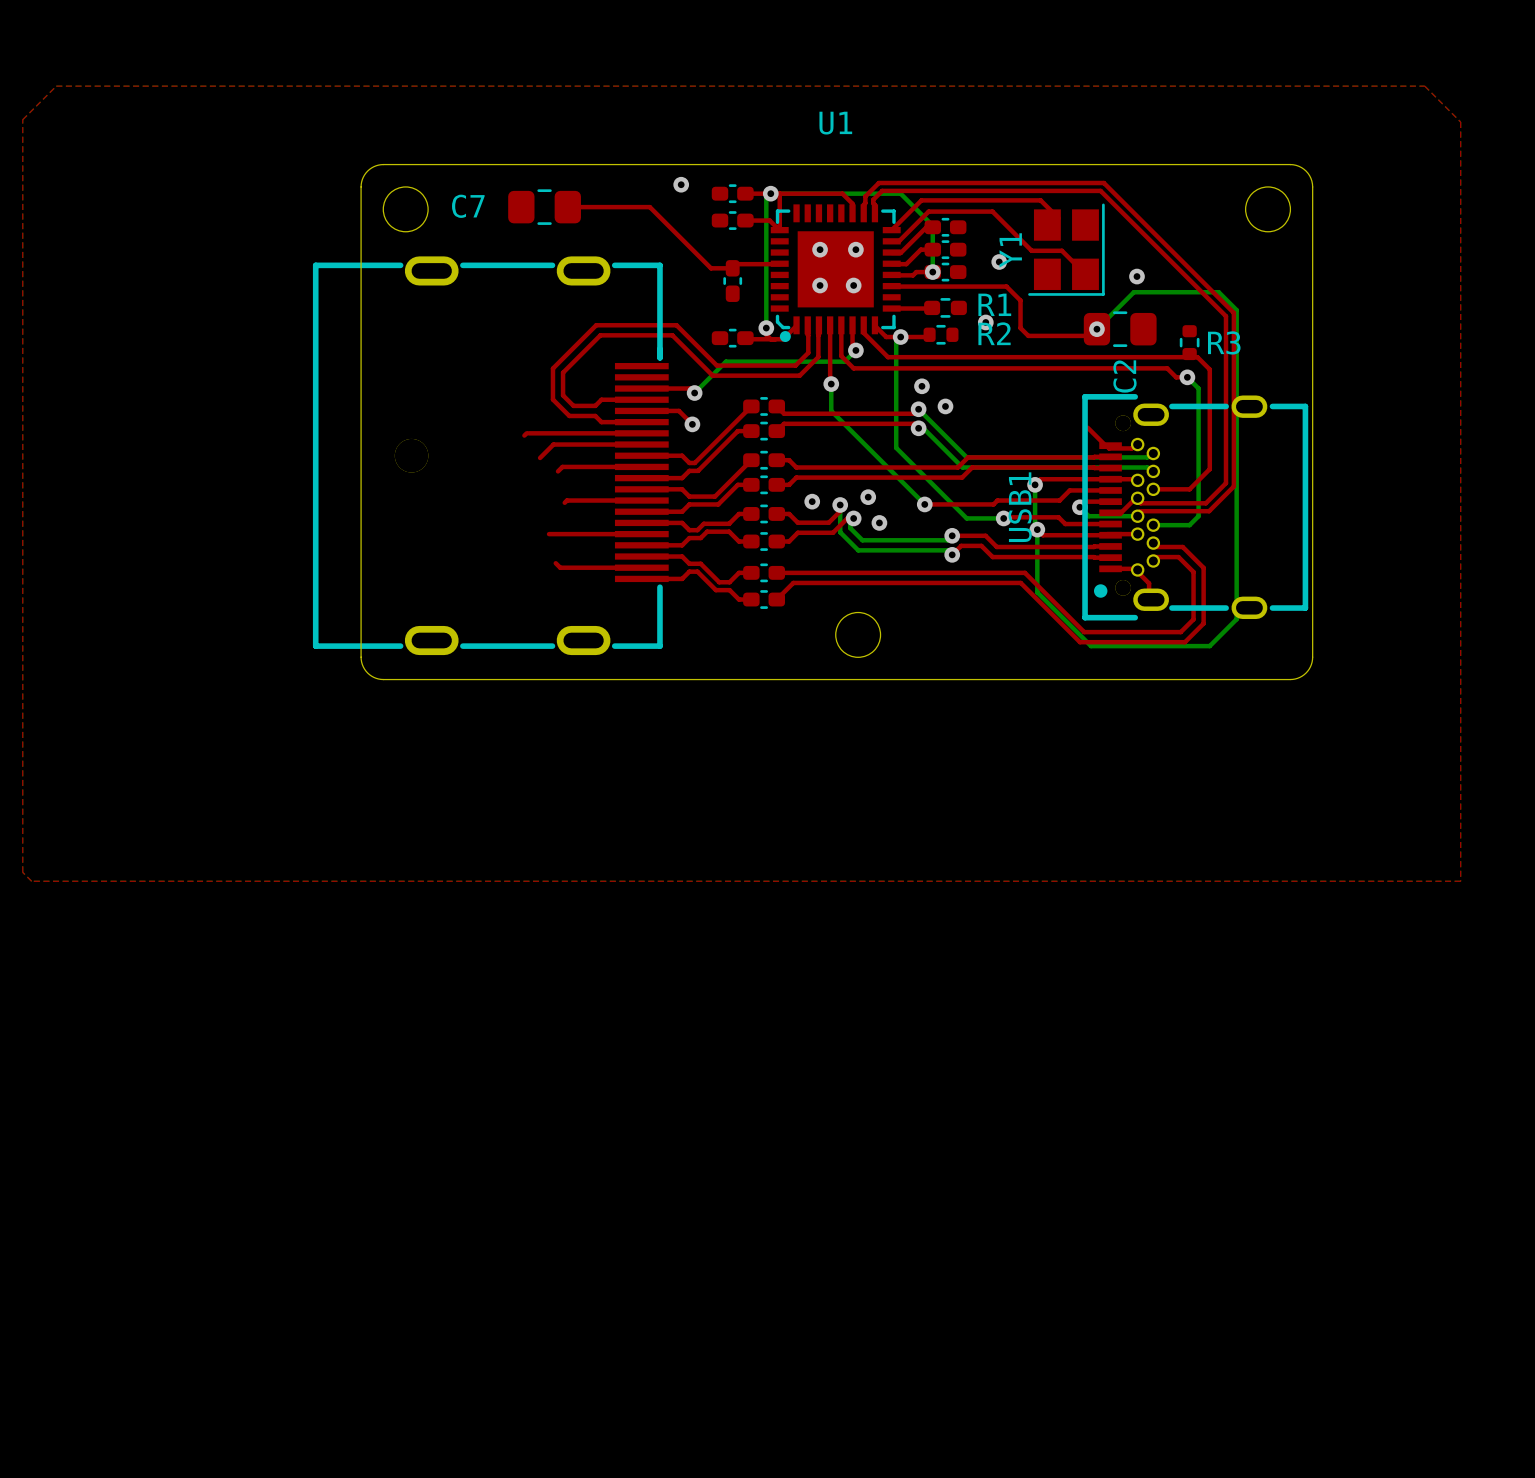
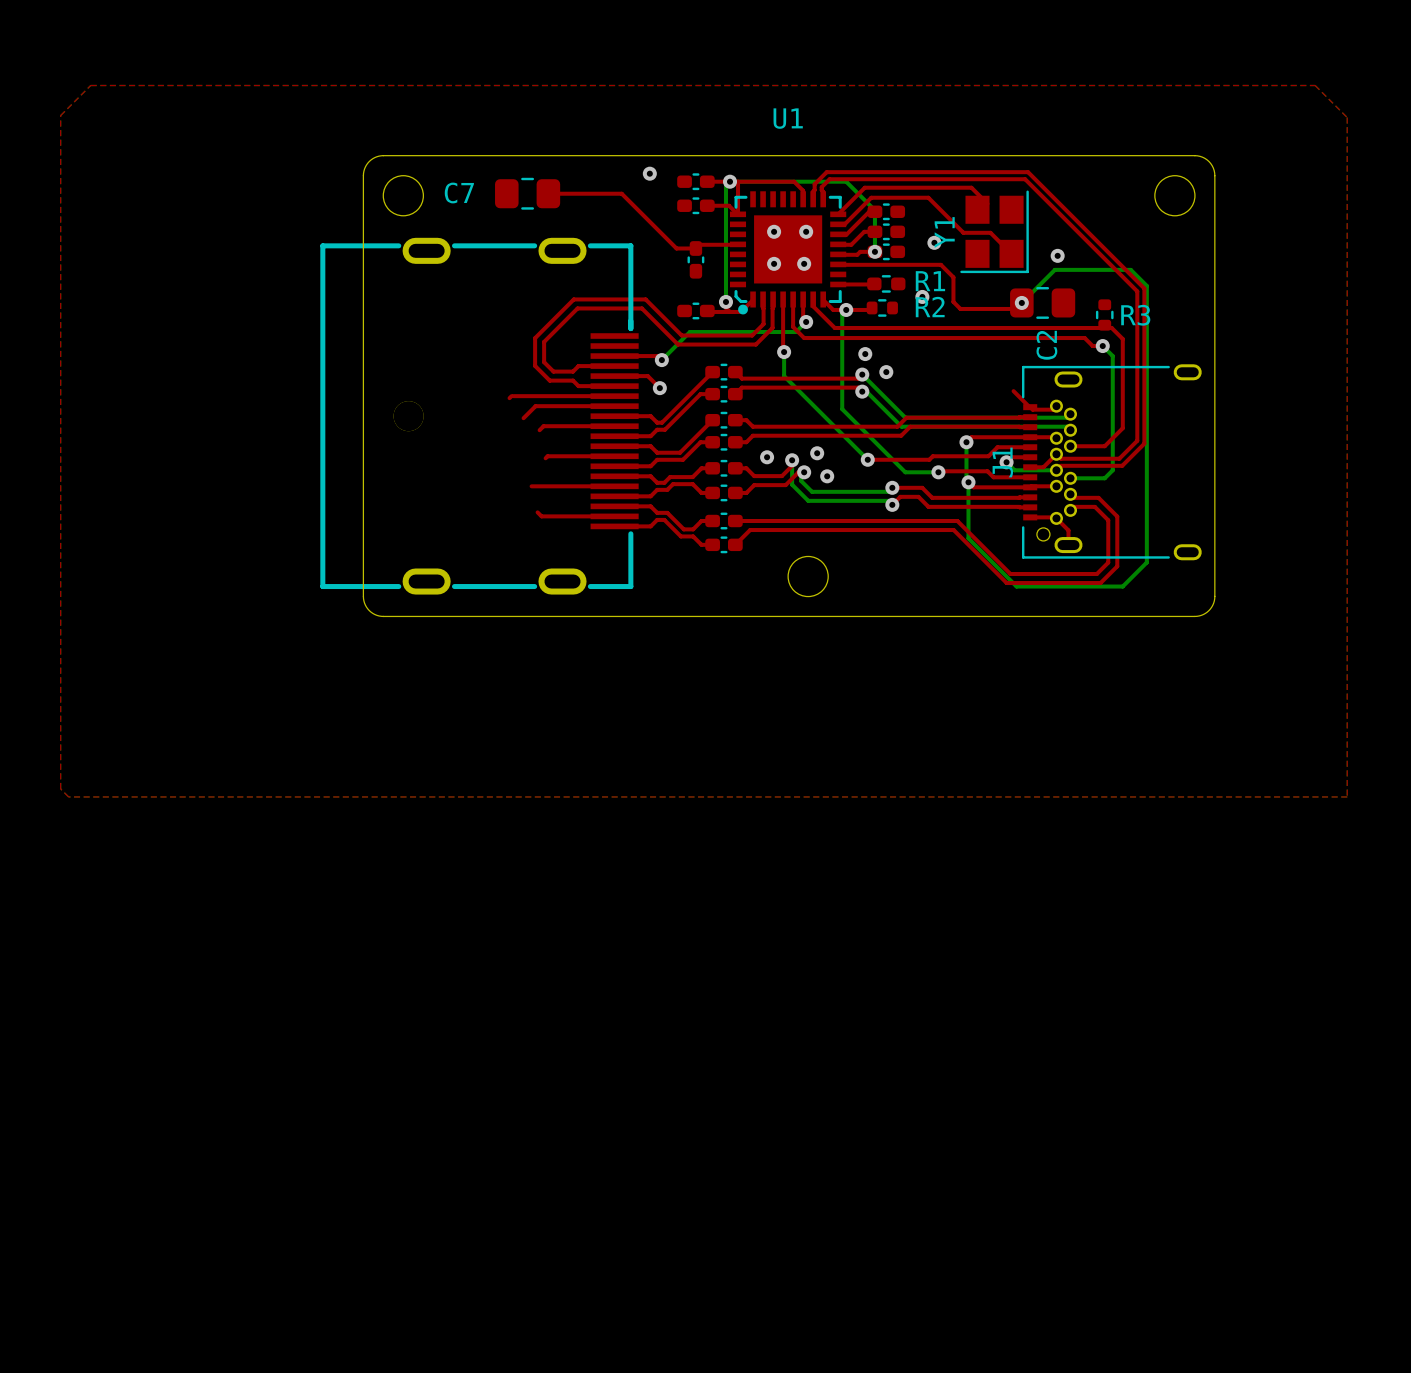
USB1: (1195, 507) -> none
J1: none -> (1111, 462)

